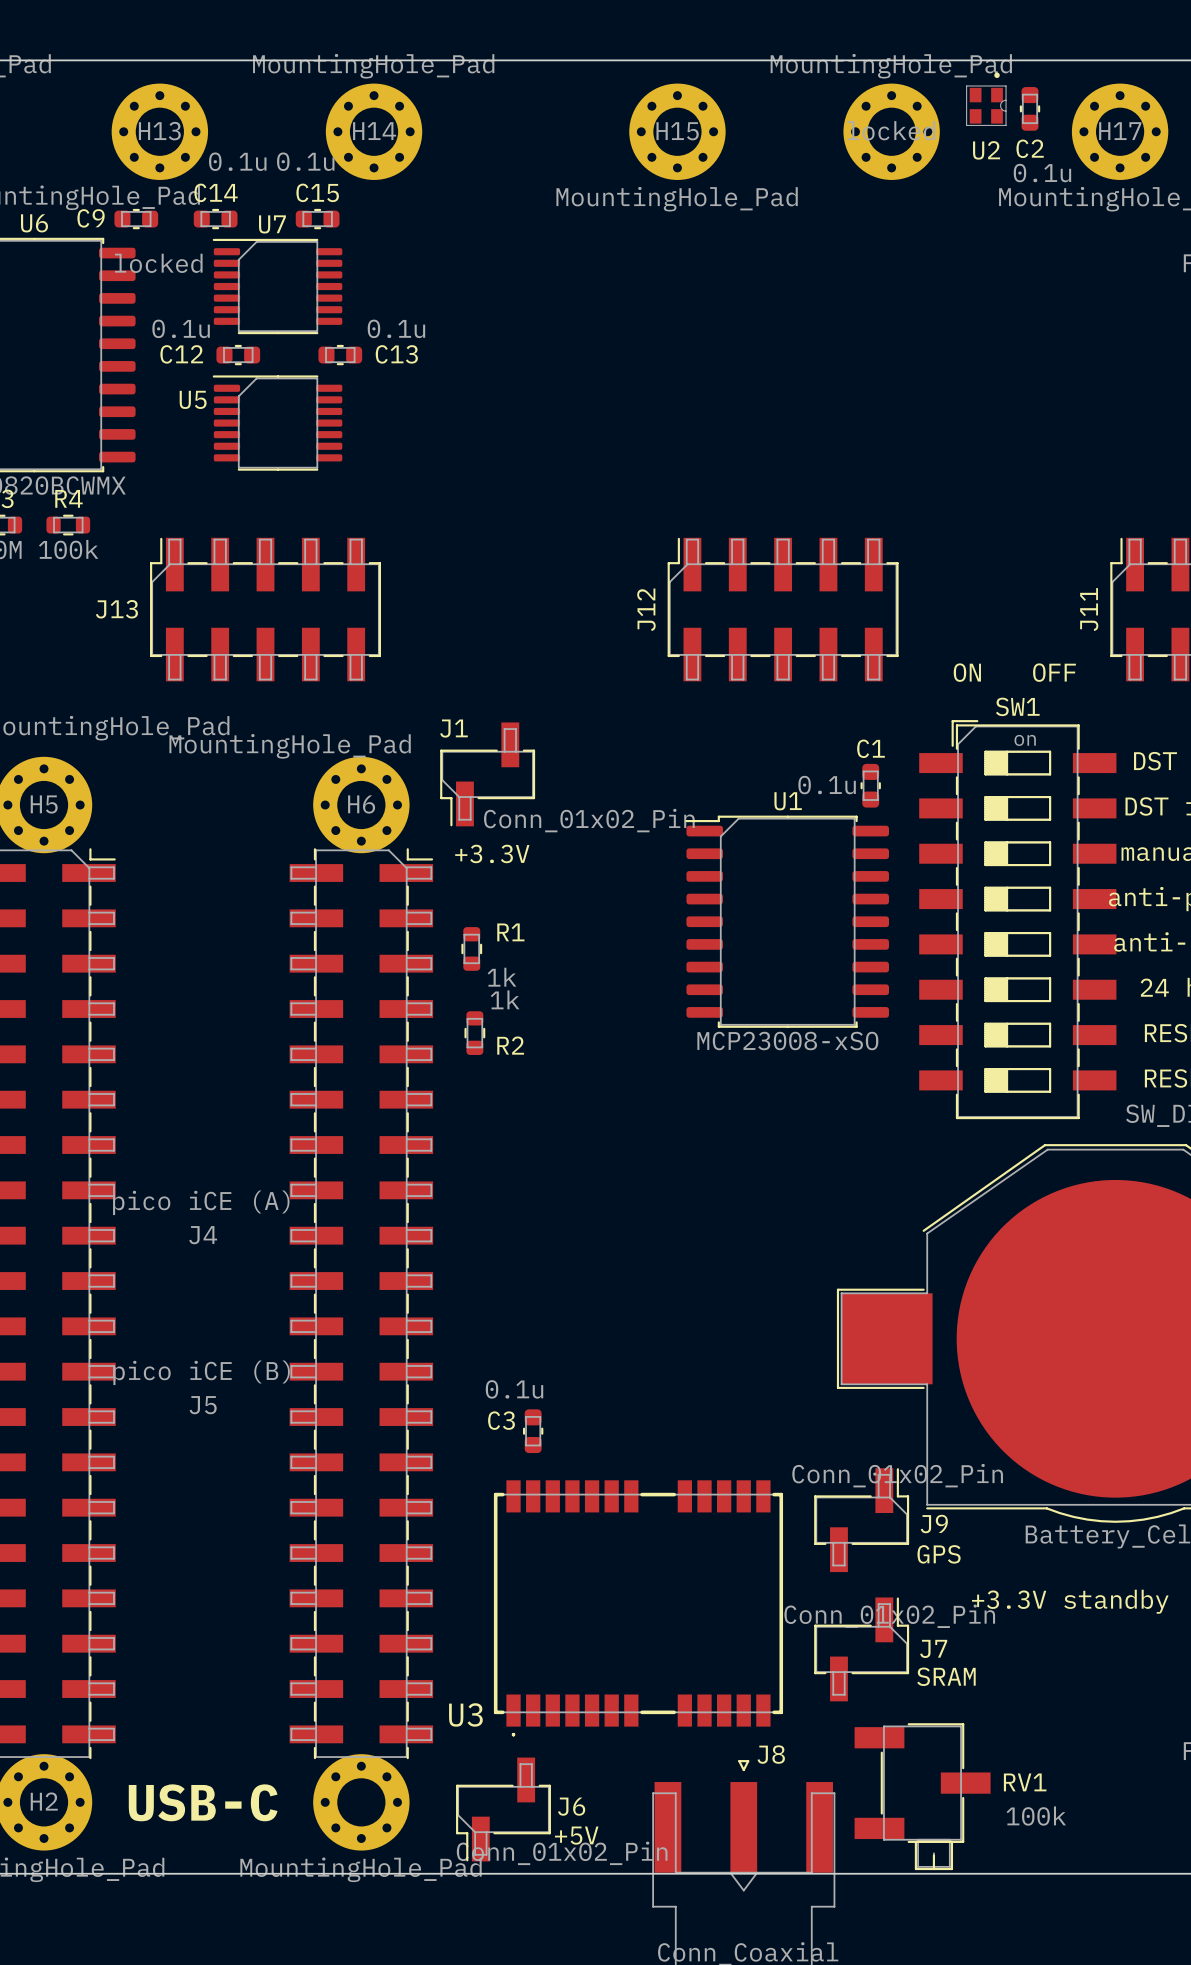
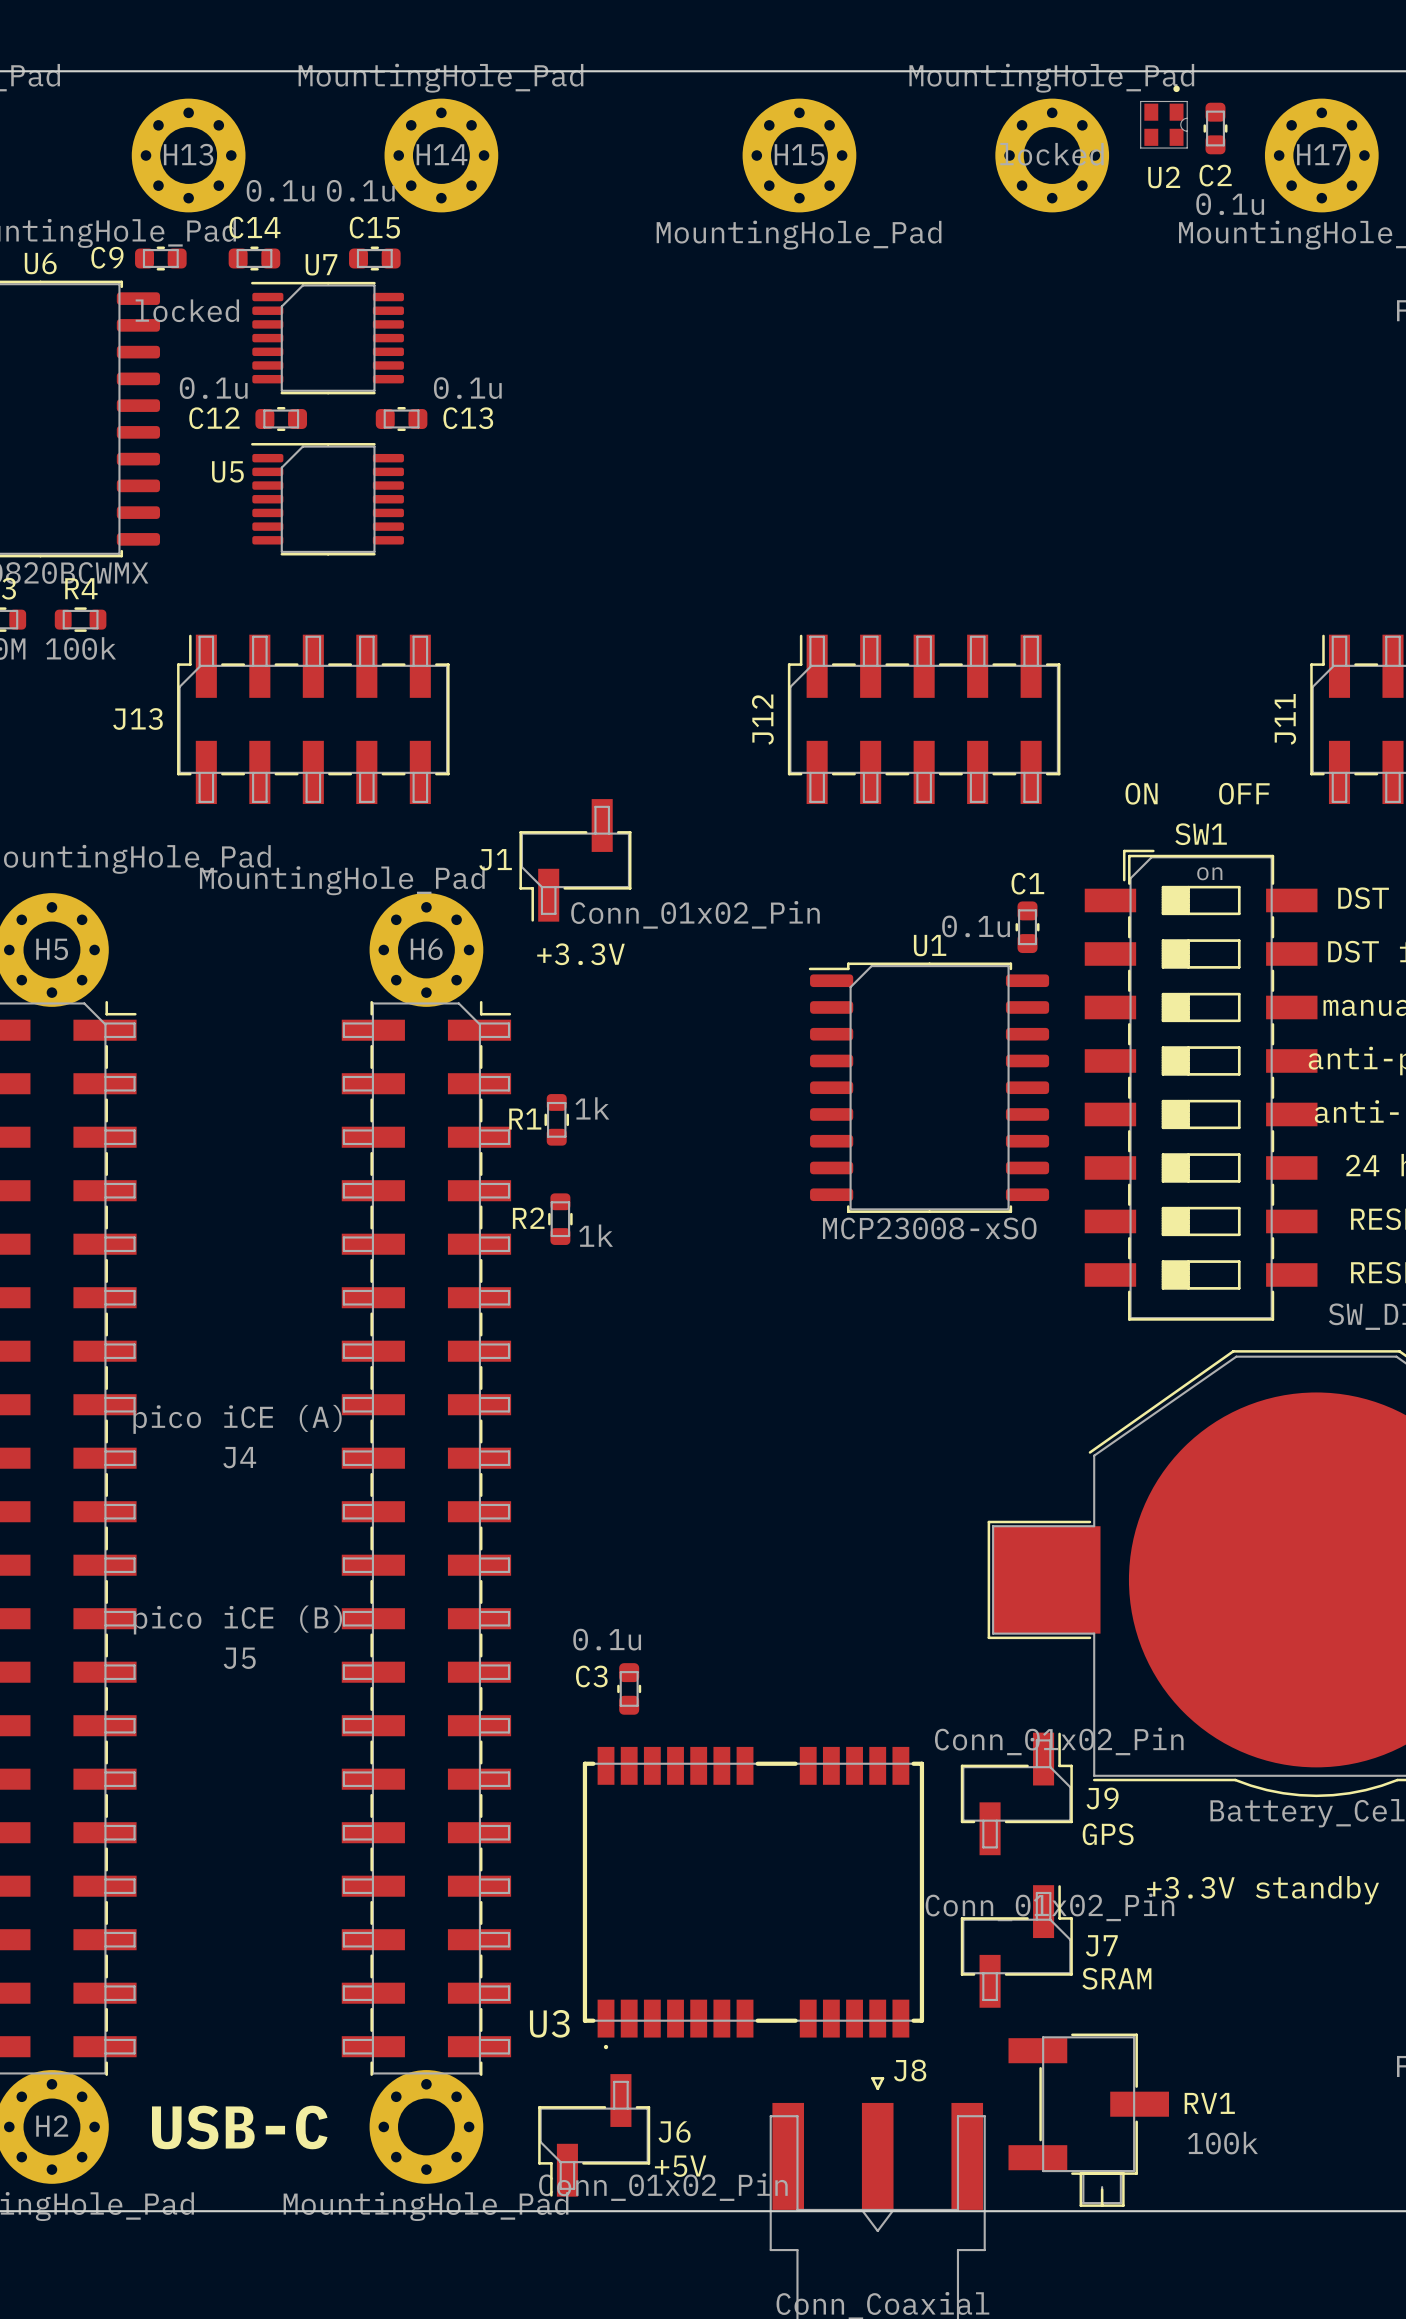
J1 name position: J1 (453, 728) -> J1 (495, 859)
J1 position: (487, 774) -> (575, 860)
text position: +3.3V (492, 853) -> +3.3V (580, 954)
R1 name position: R1 (510, 932) -> R1 (525, 1119)
R1 value position: 1k (501, 977) -> 1k (592, 1108)
R2 value position: 1k (505, 999) -> 1k (596, 1235)
R2 name position: R2 (510, 1045) -> R2 (528, 1218)

